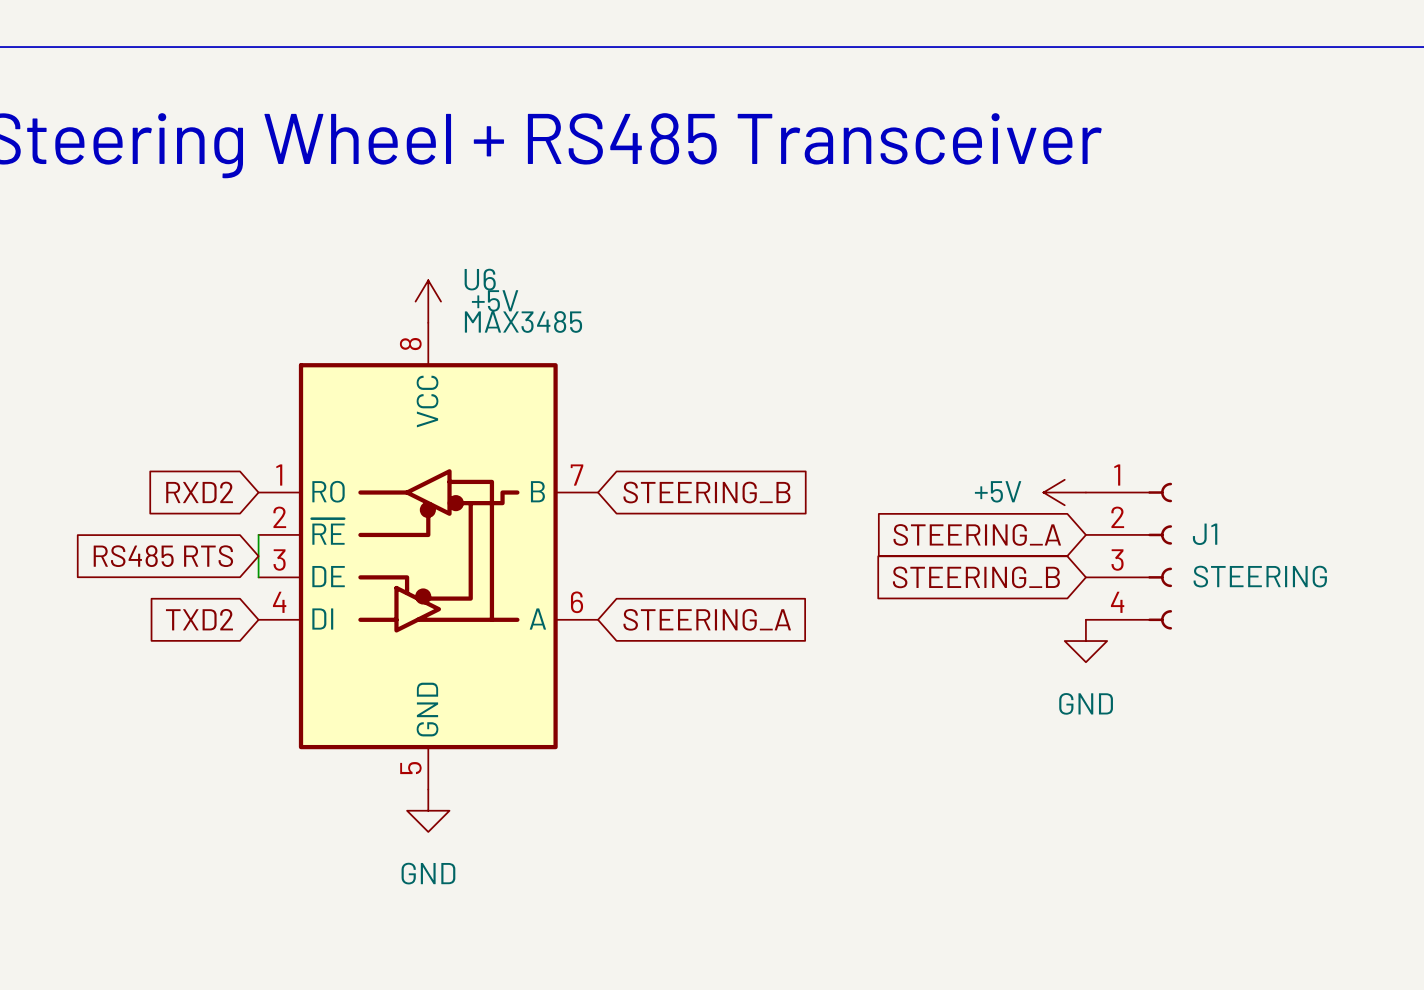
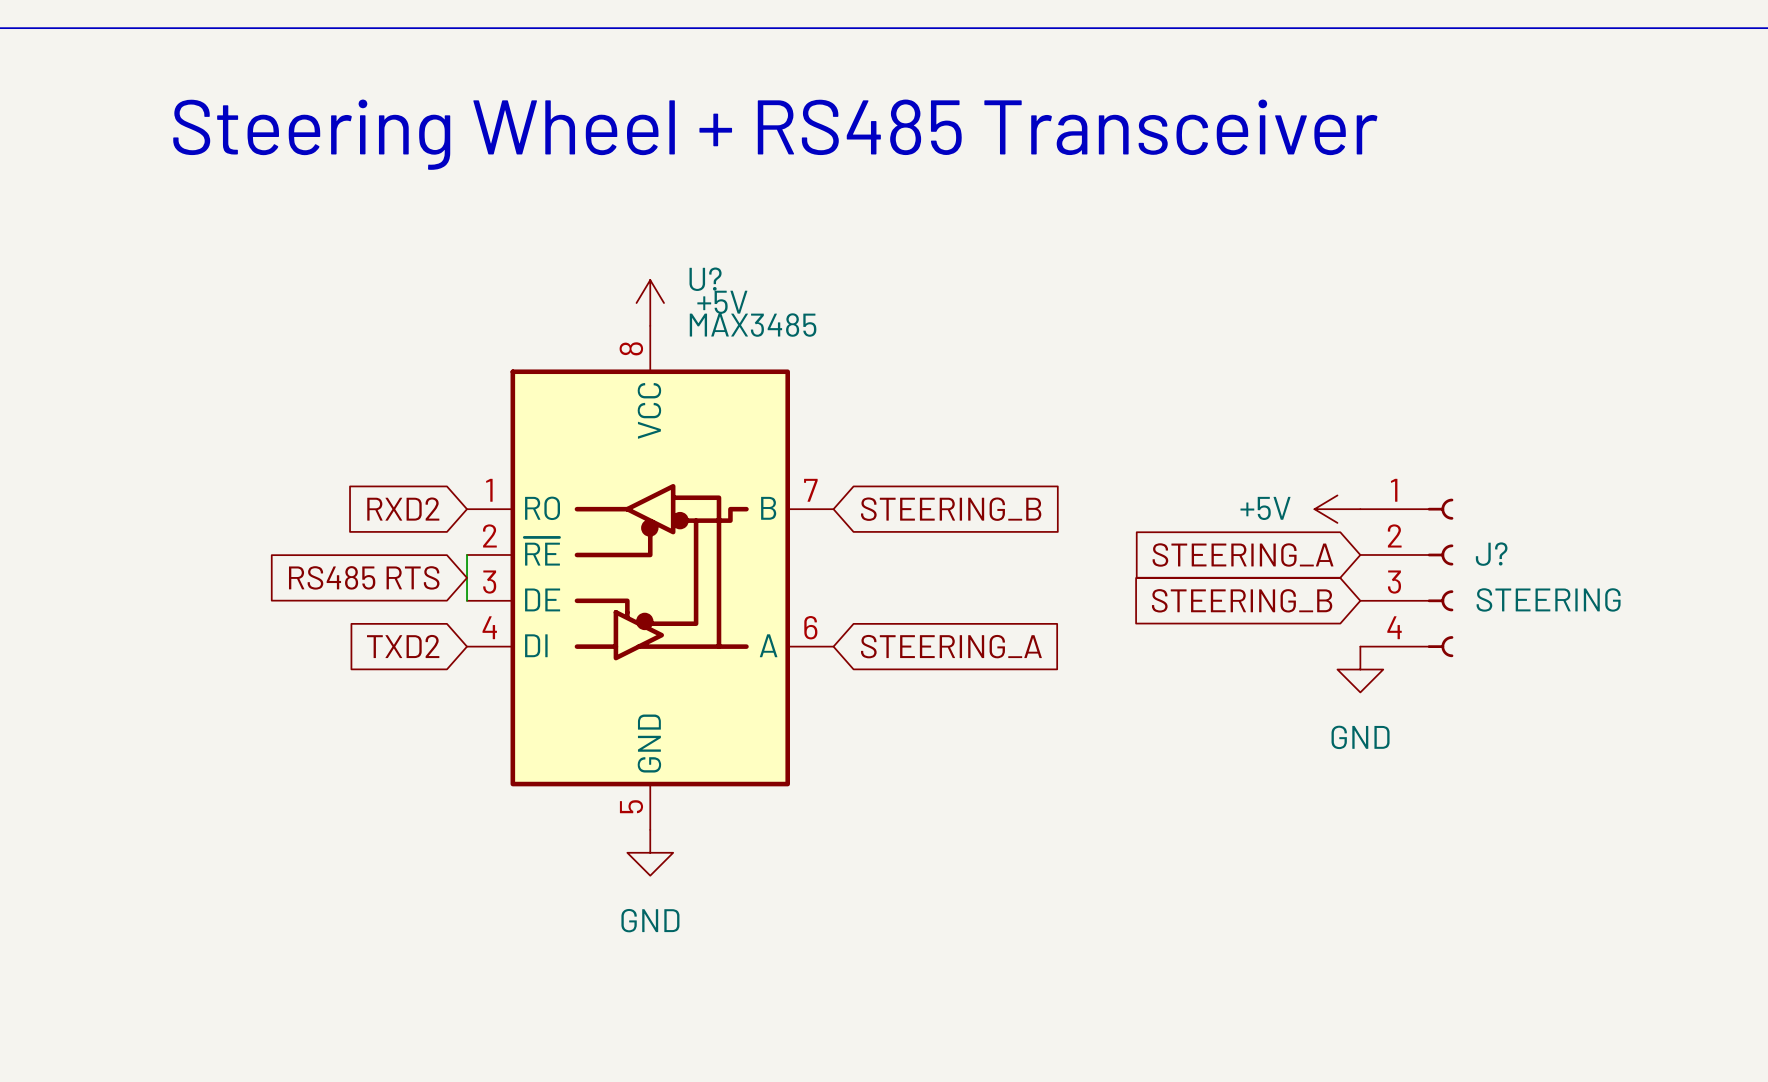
U6 name: U6 (480, 279) -> U? (705, 279)
J1 name: J1 (1205, 534) -> J? (1491, 554)

